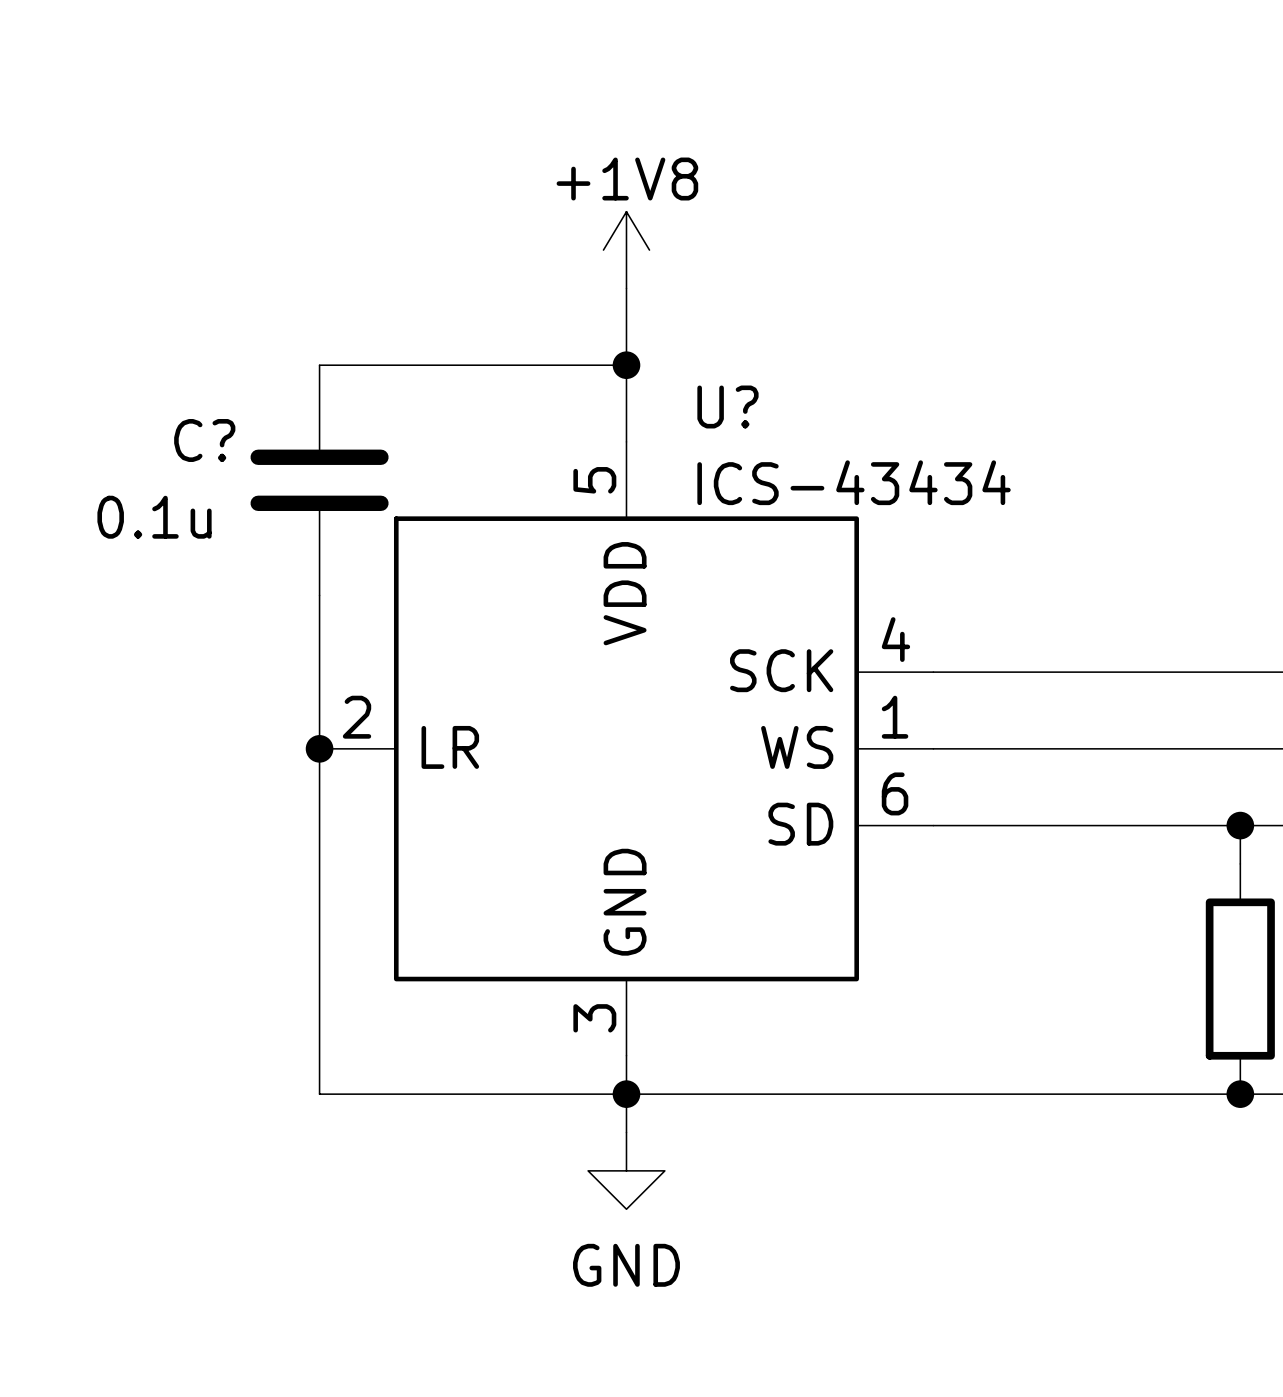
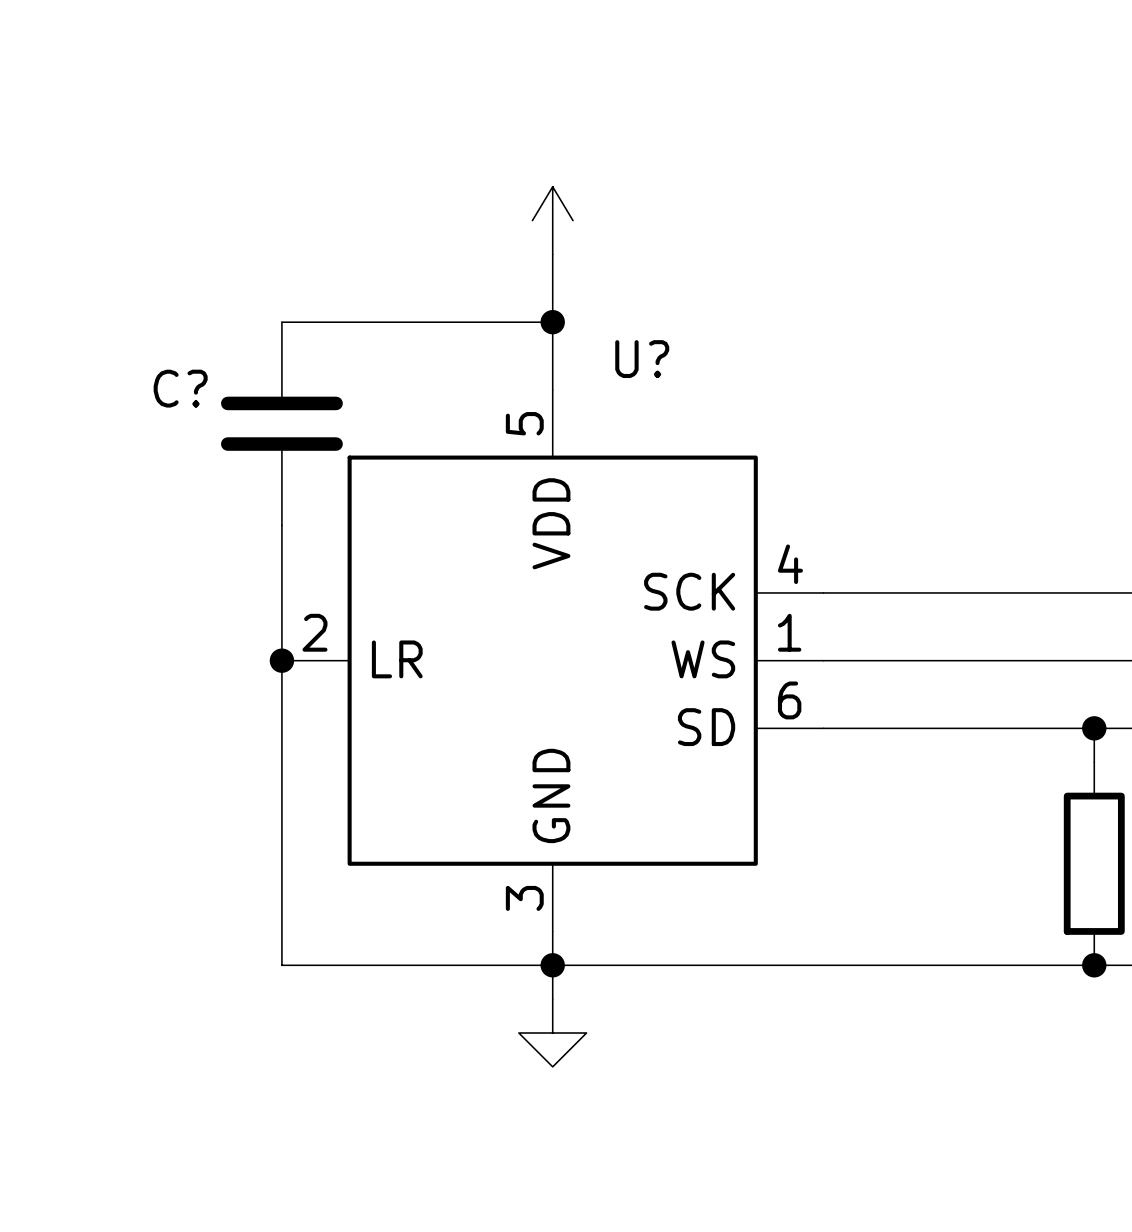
power symbol text: +1V8 (627, 179) -> none
U? value: ICS-43434 (854, 482) -> none
C? value: 0.1u (154, 517) -> none
power symbol text: GND (626, 1265) -> none

